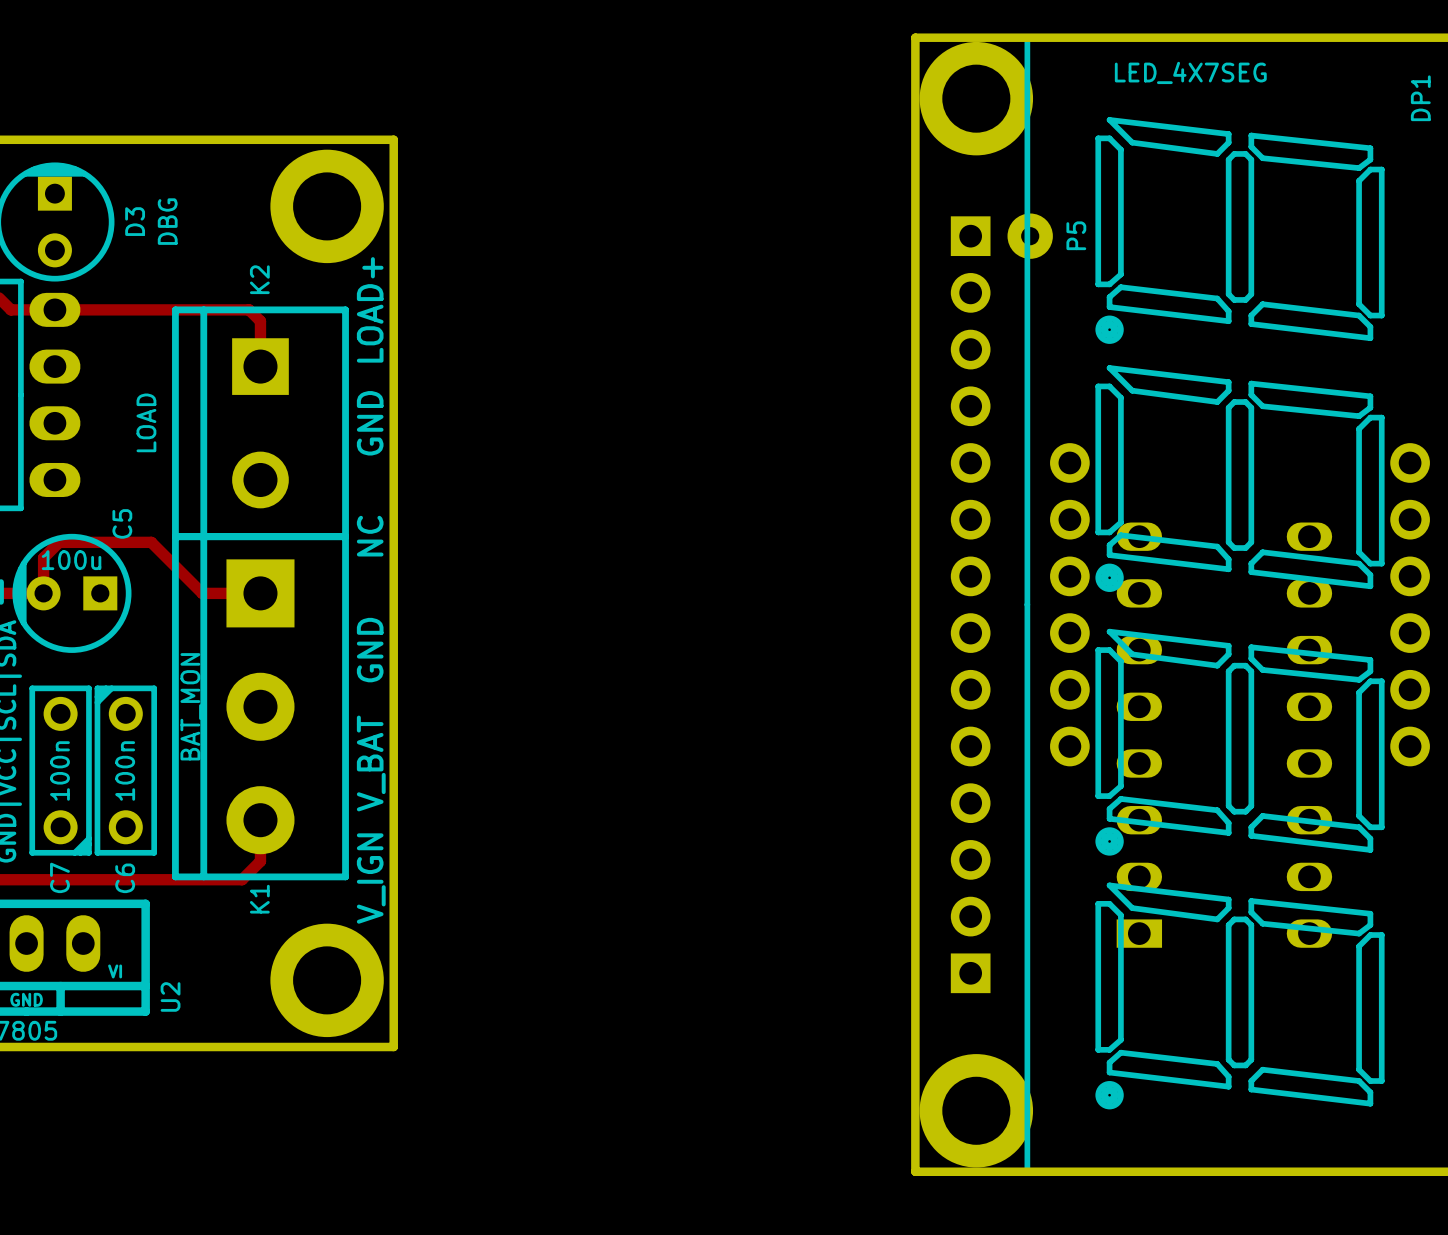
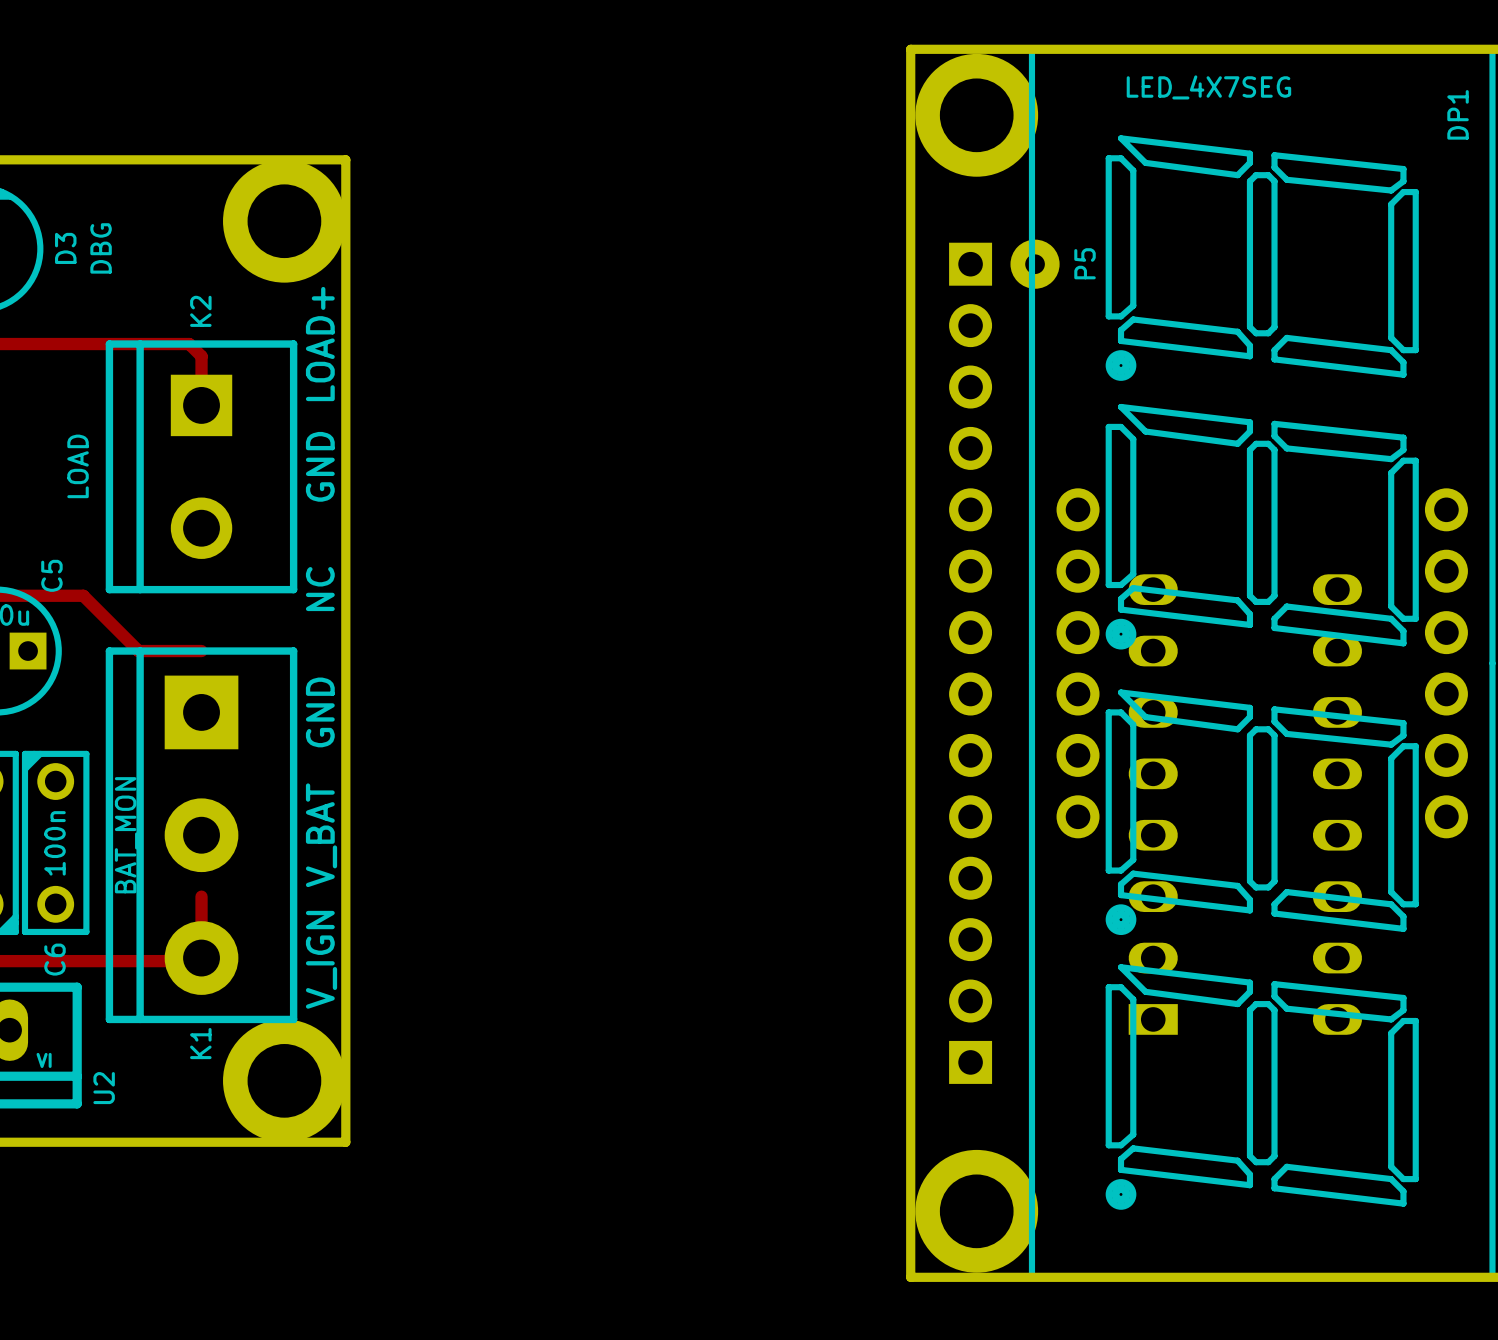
part position: (327, 206) -> (284, 221)
K1 position: (260, 706) -> (201, 835)
part position: (327, 980) -> (284, 1080)

